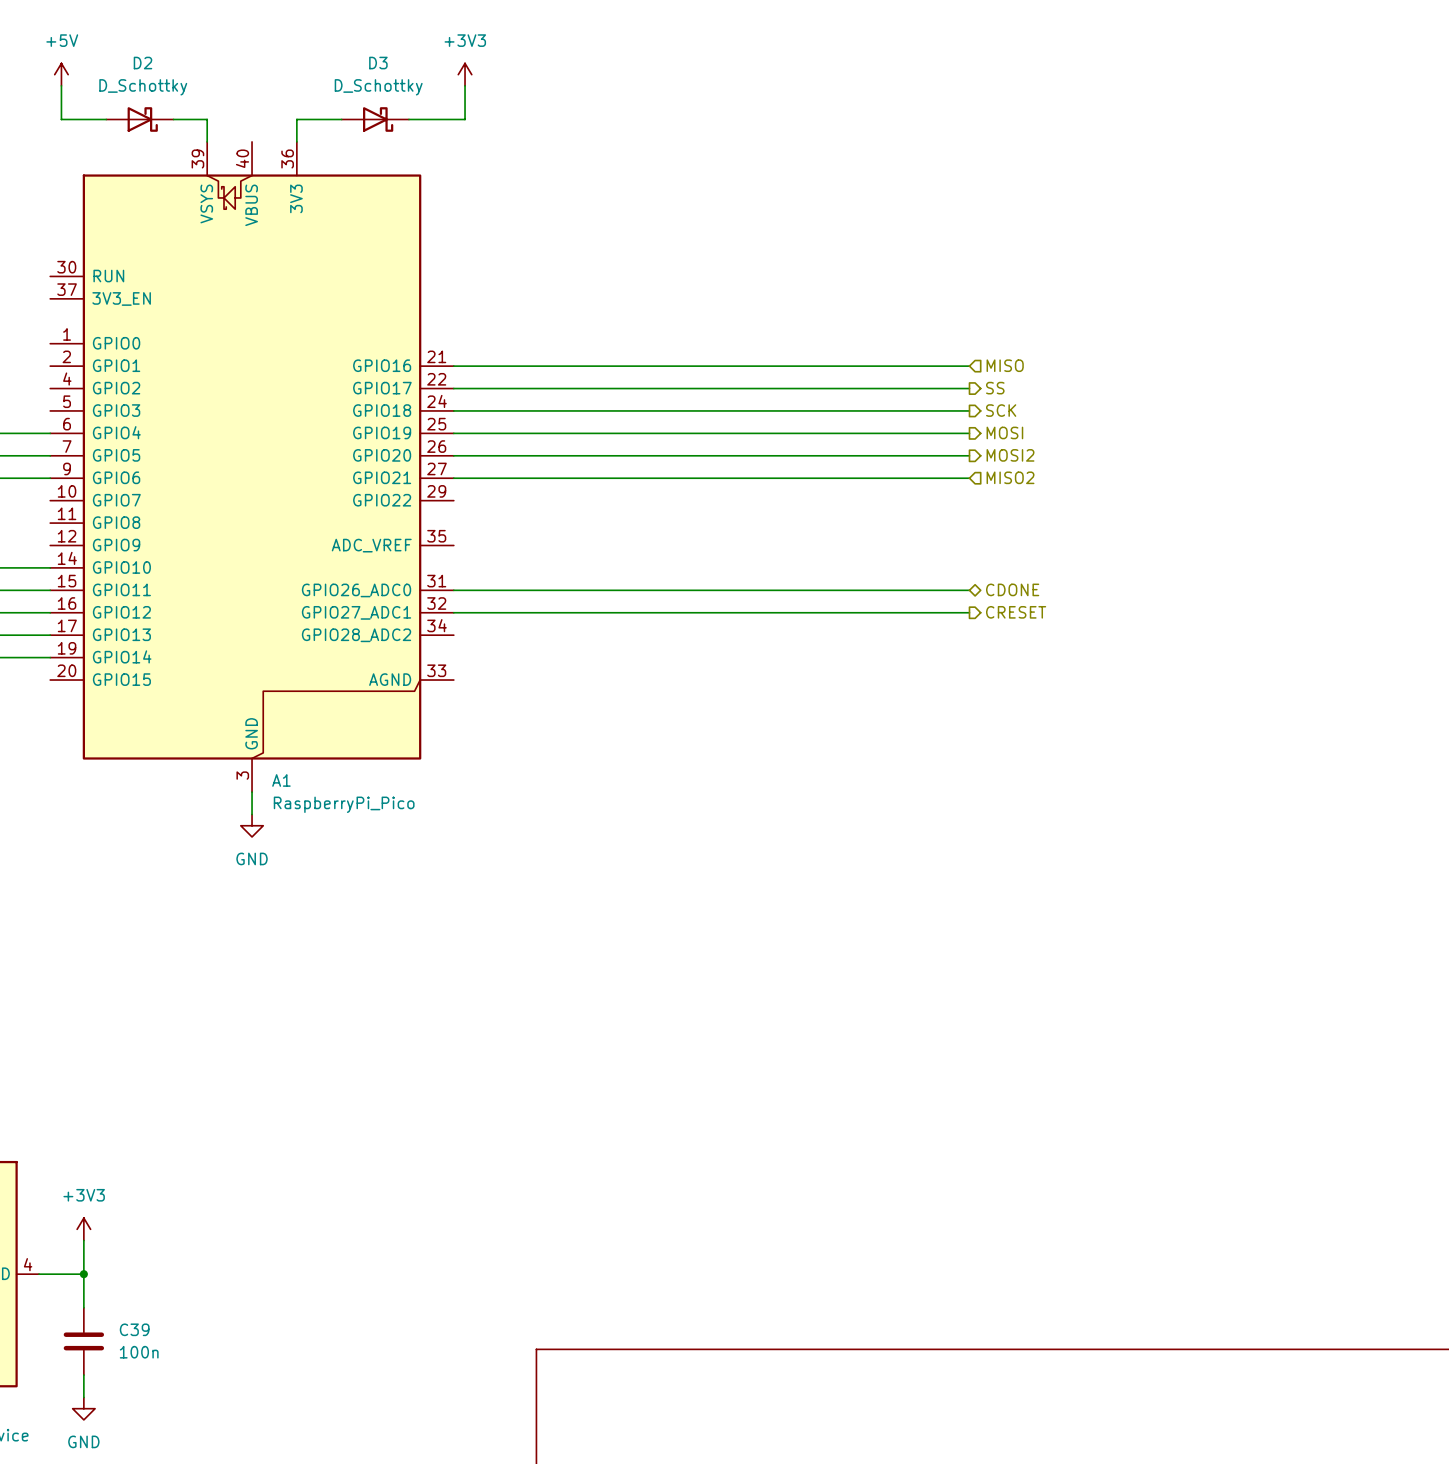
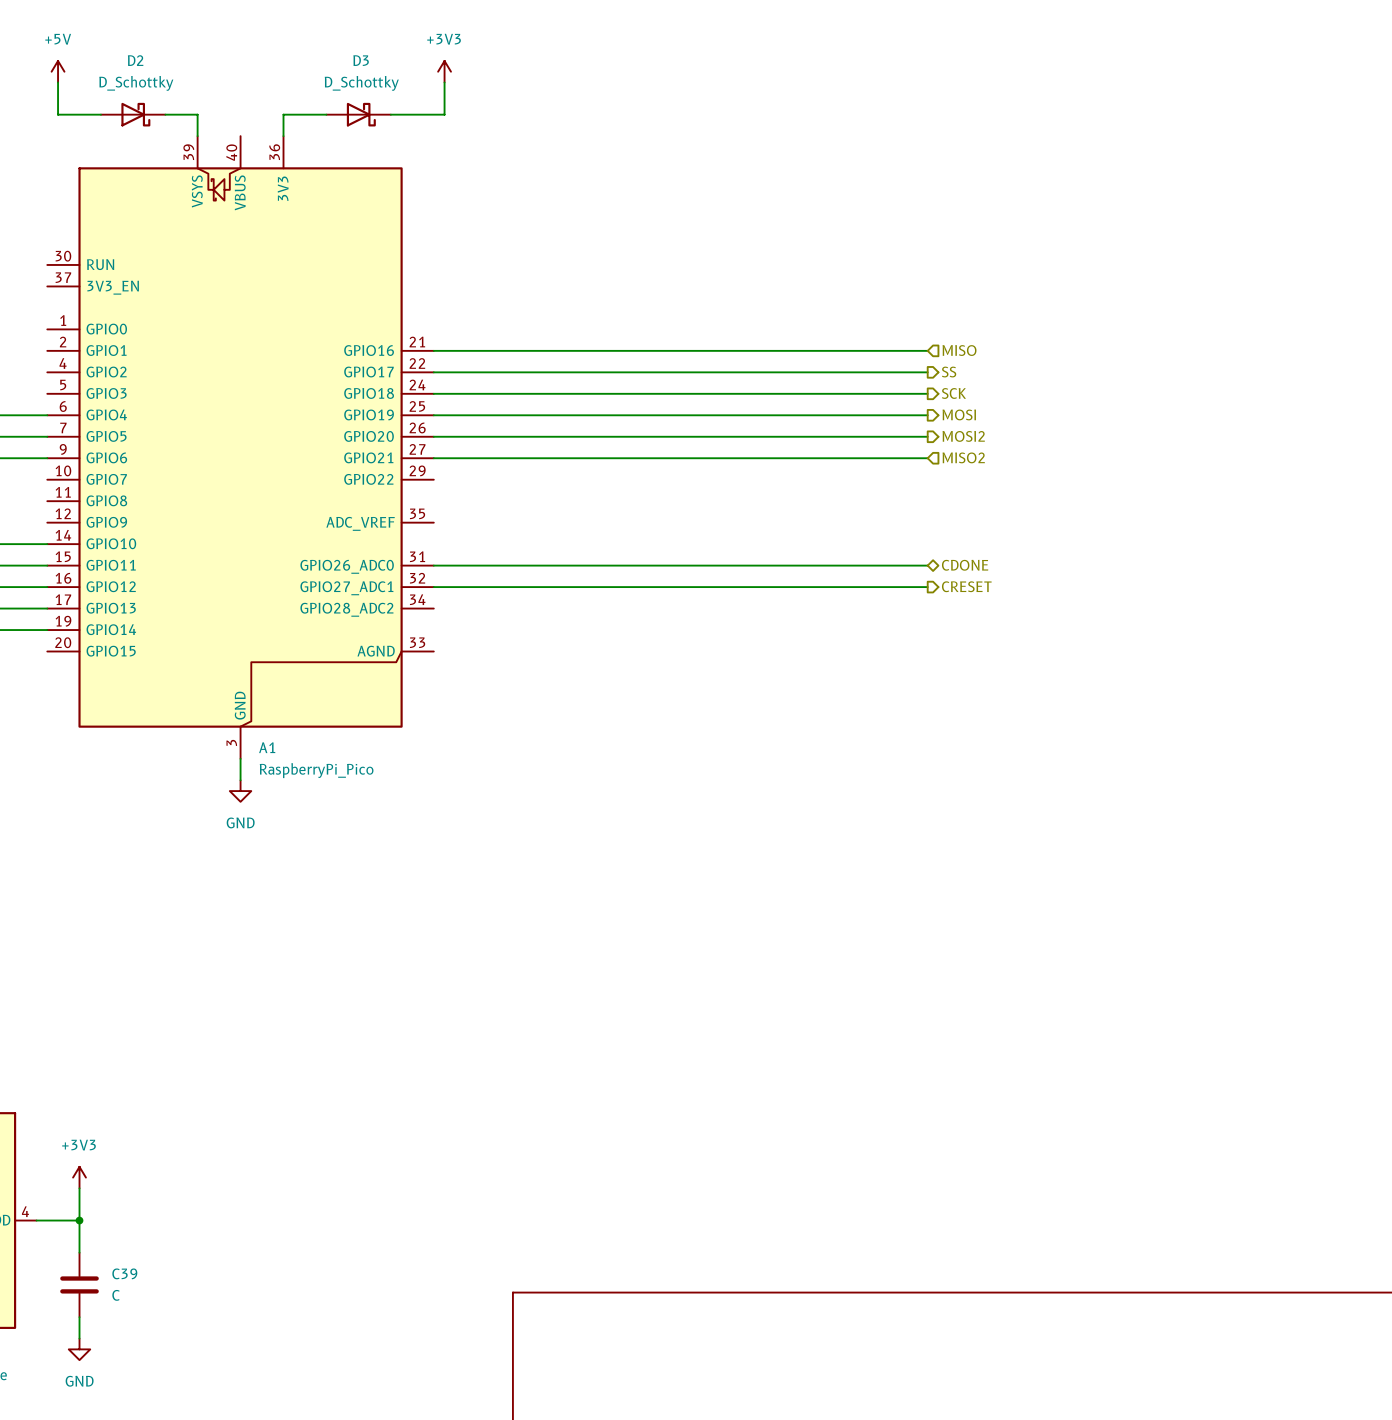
C39 value: 100n (139, 1352) -> C (116, 1295)

